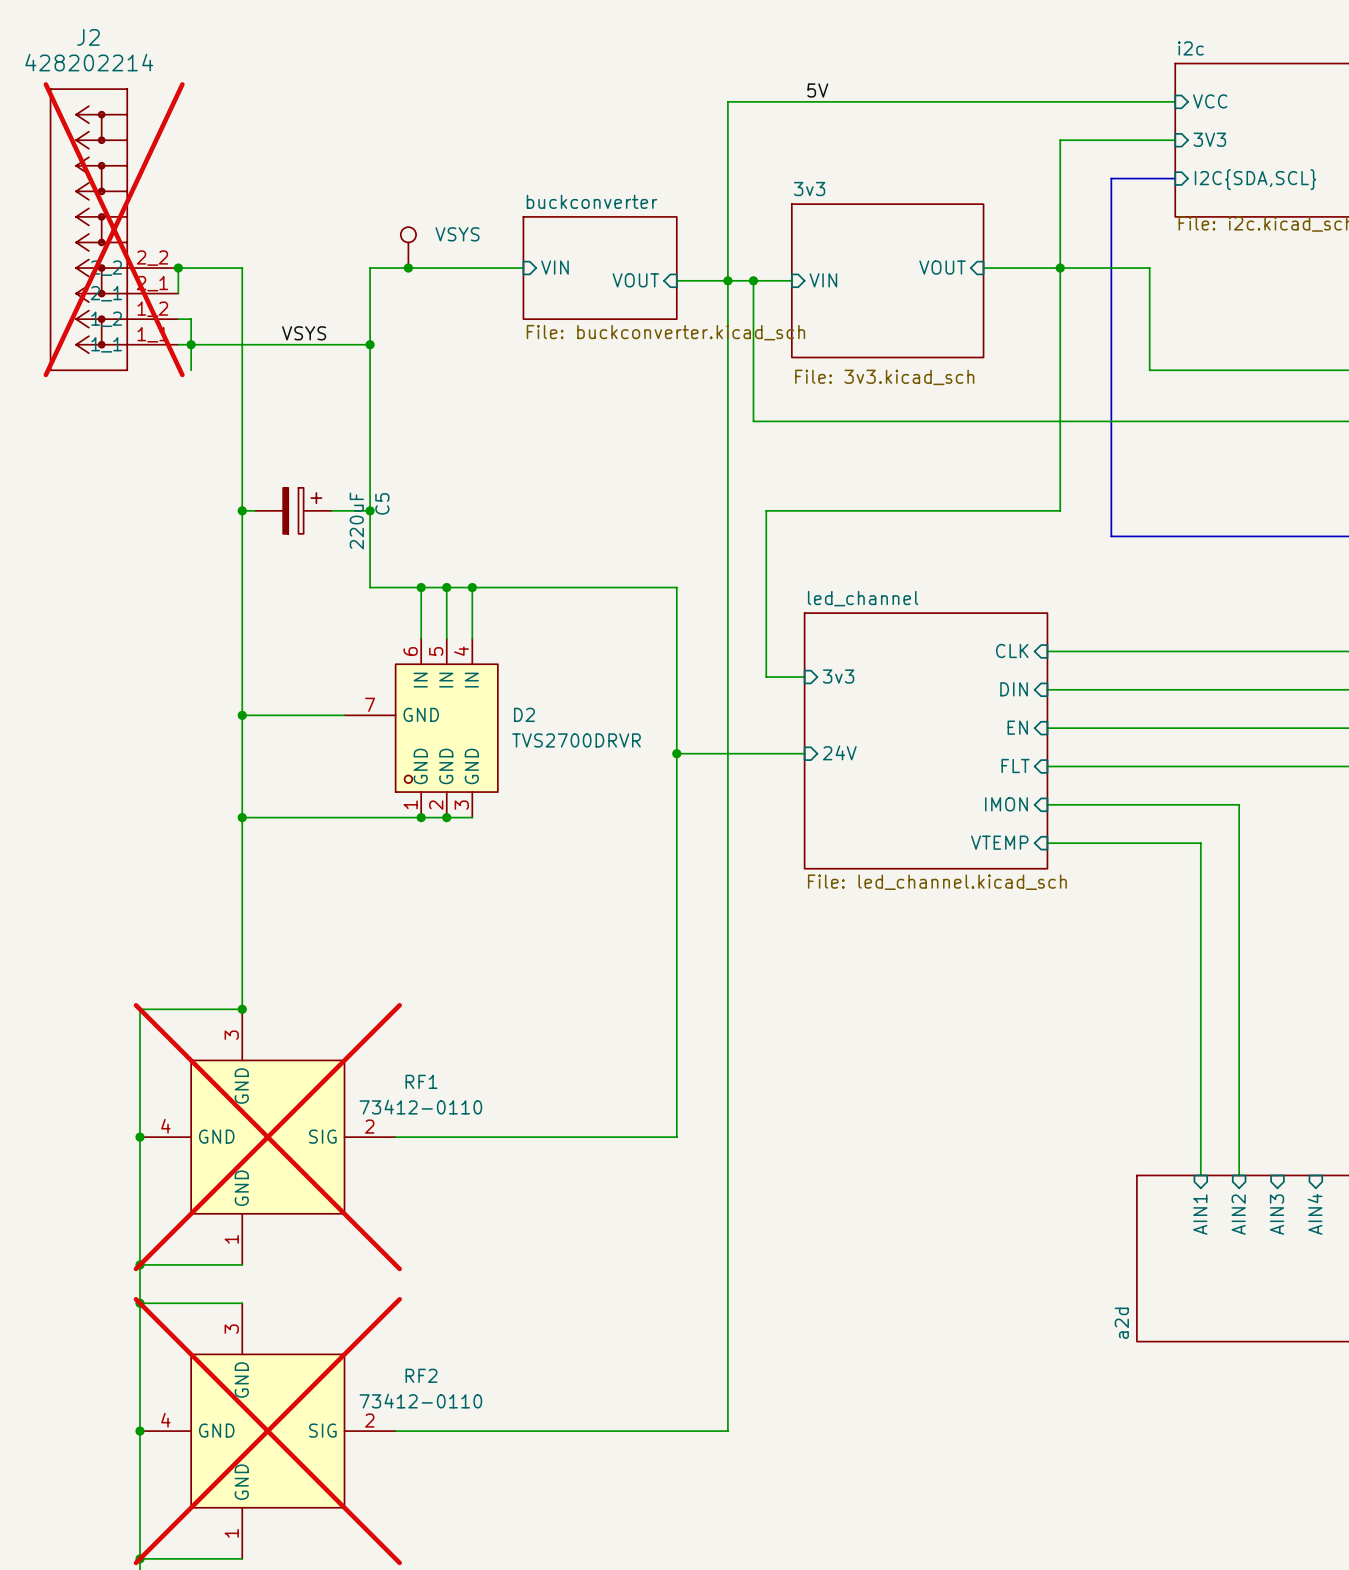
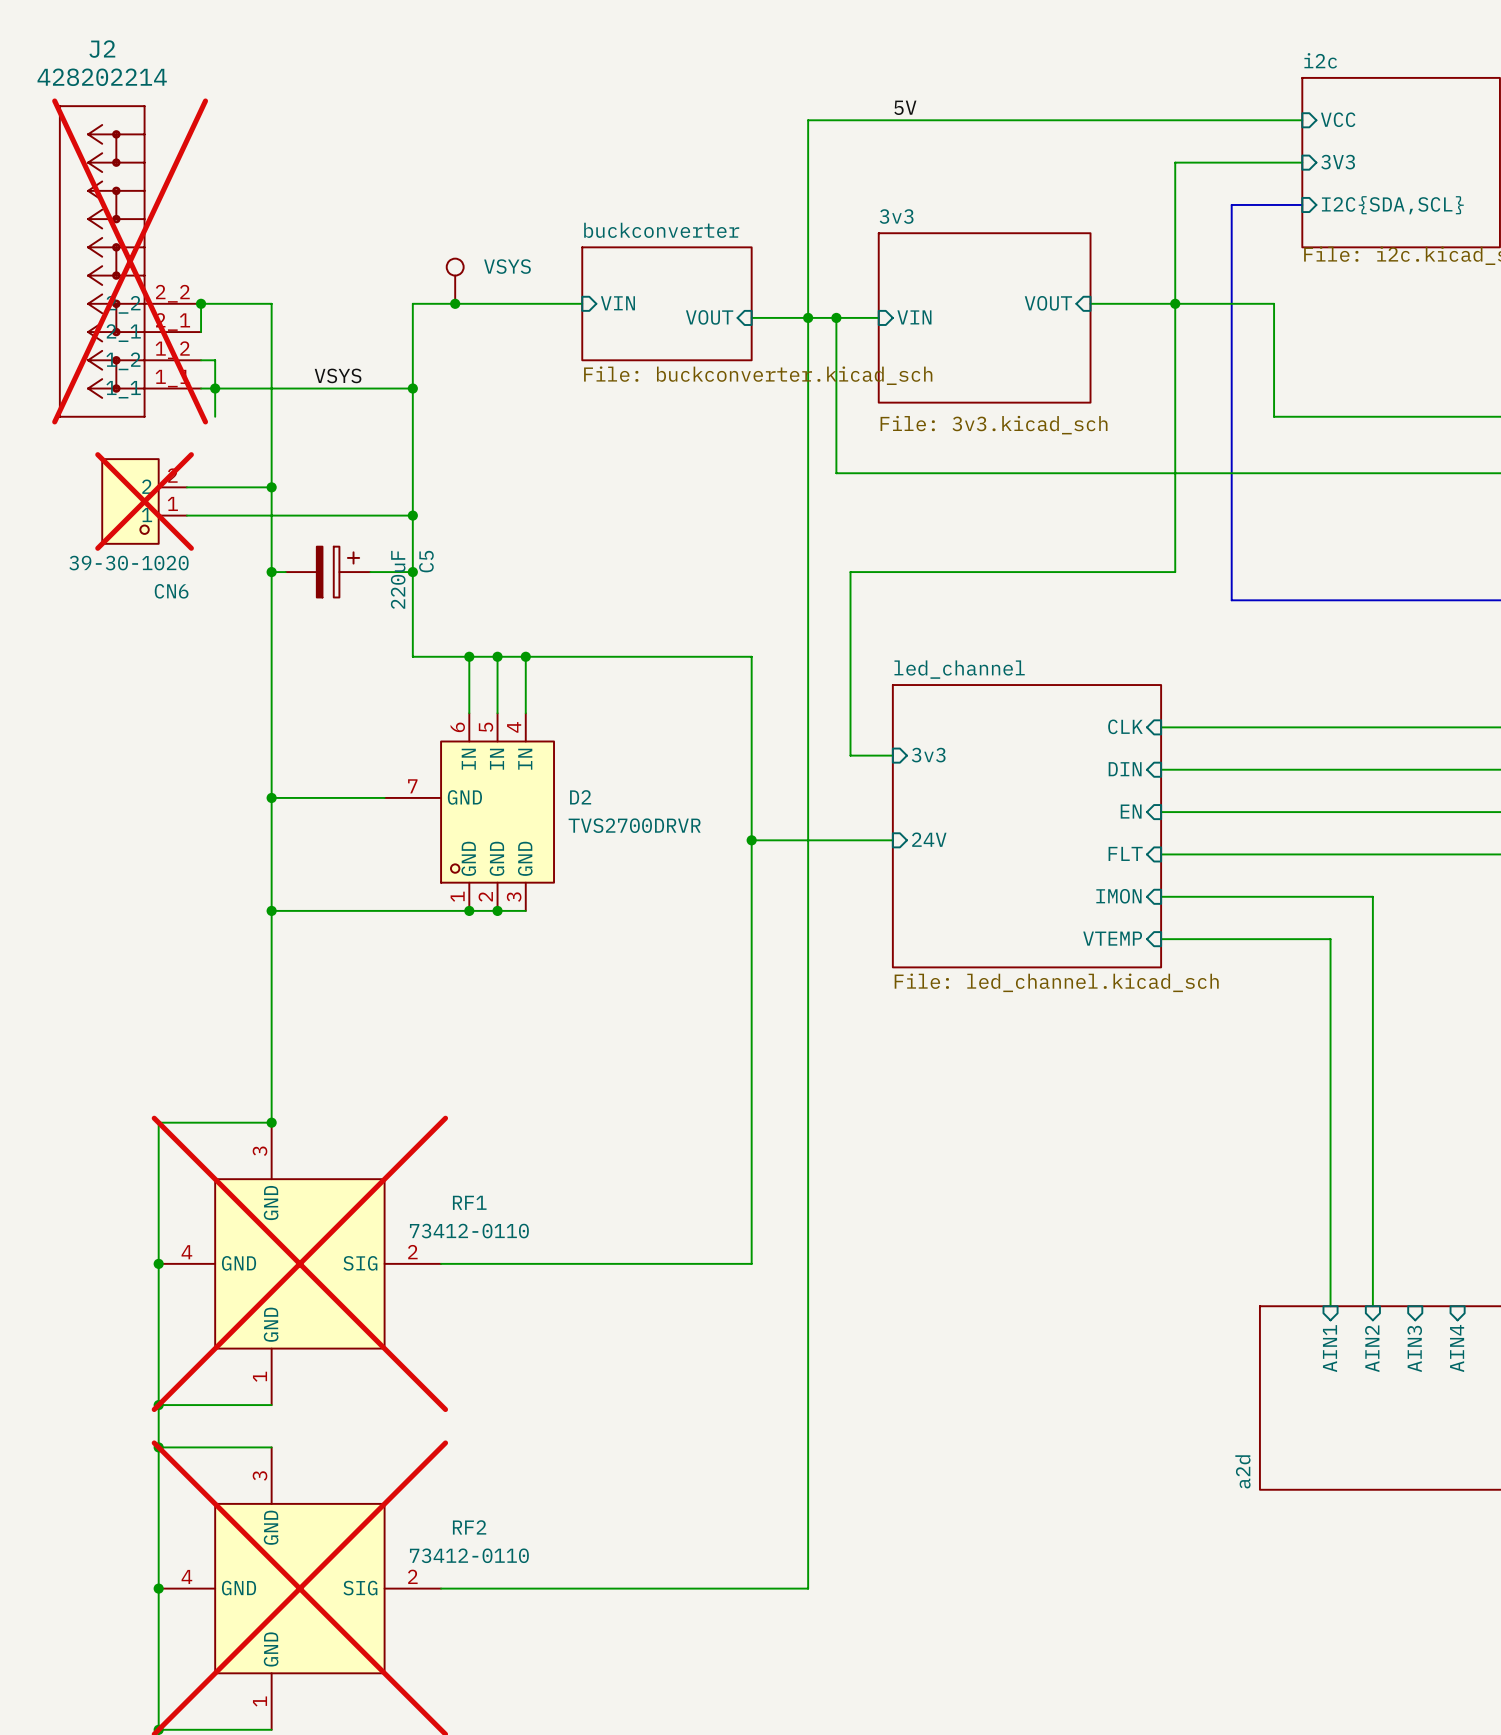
wire: none -> (186, 487) (271, 487)
junction: none -> (271, 487)
CN6: none -> 39-30-1020 (144, 501)
wire: none -> (186, 515) (412, 515)
junction: none -> (412, 515)

